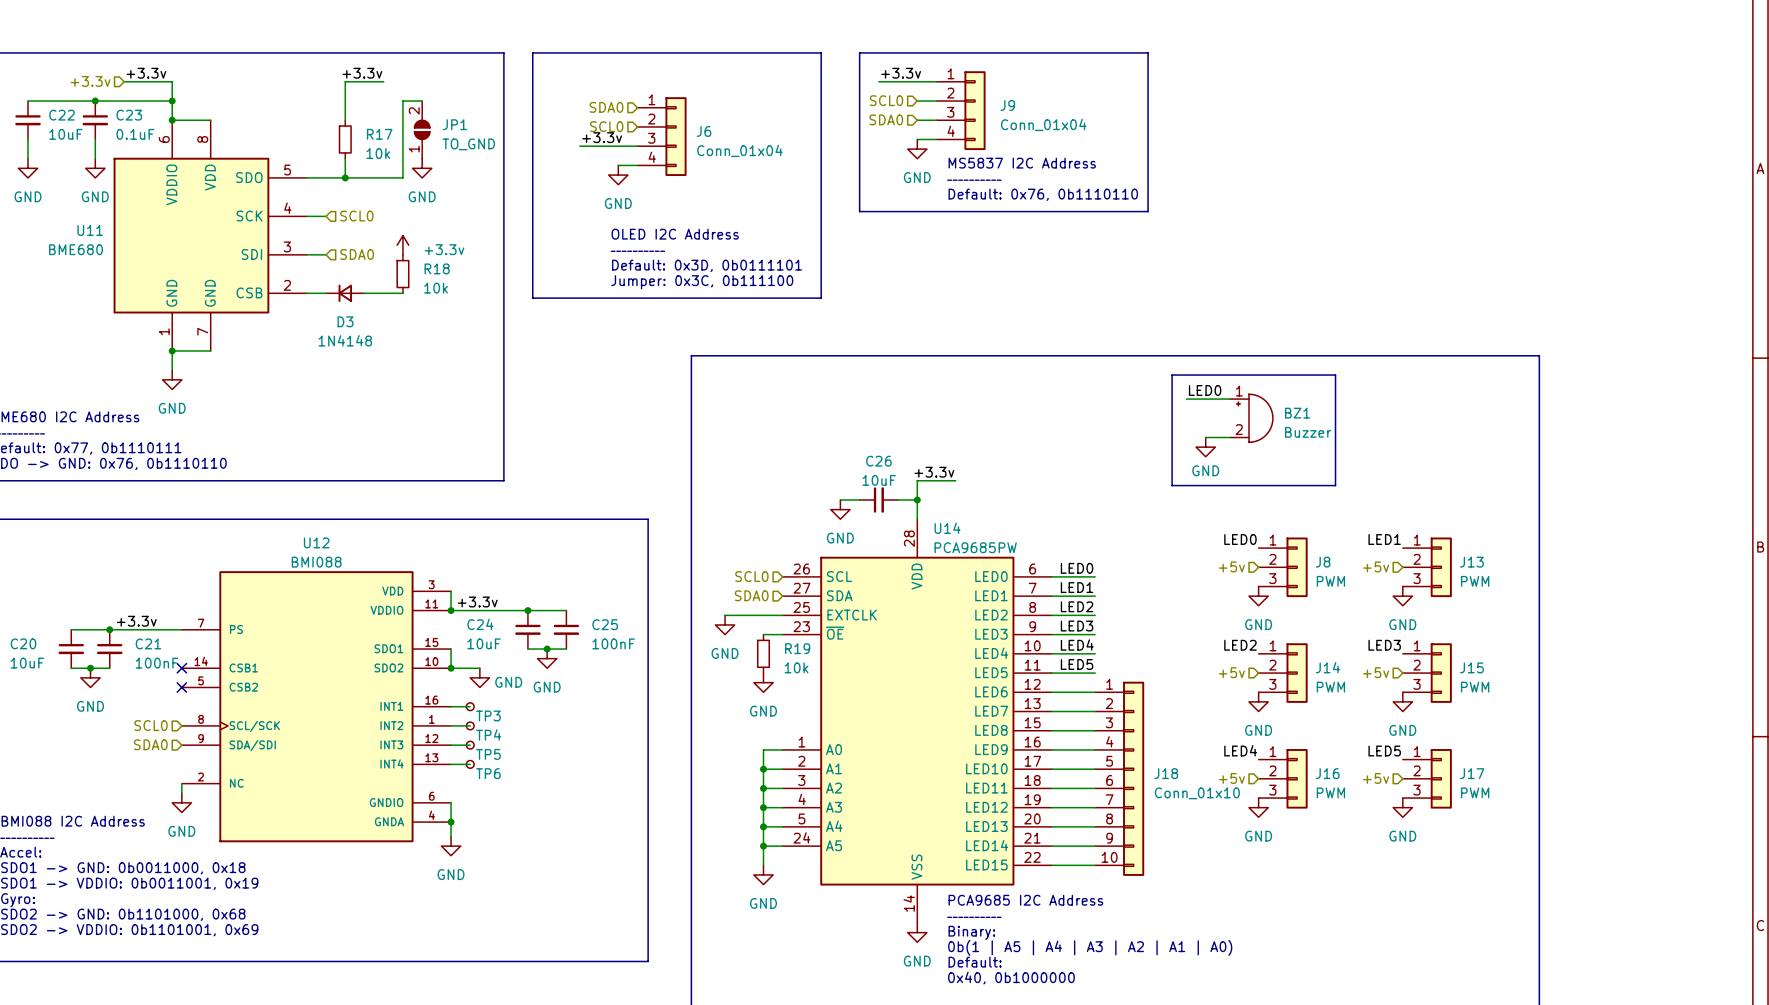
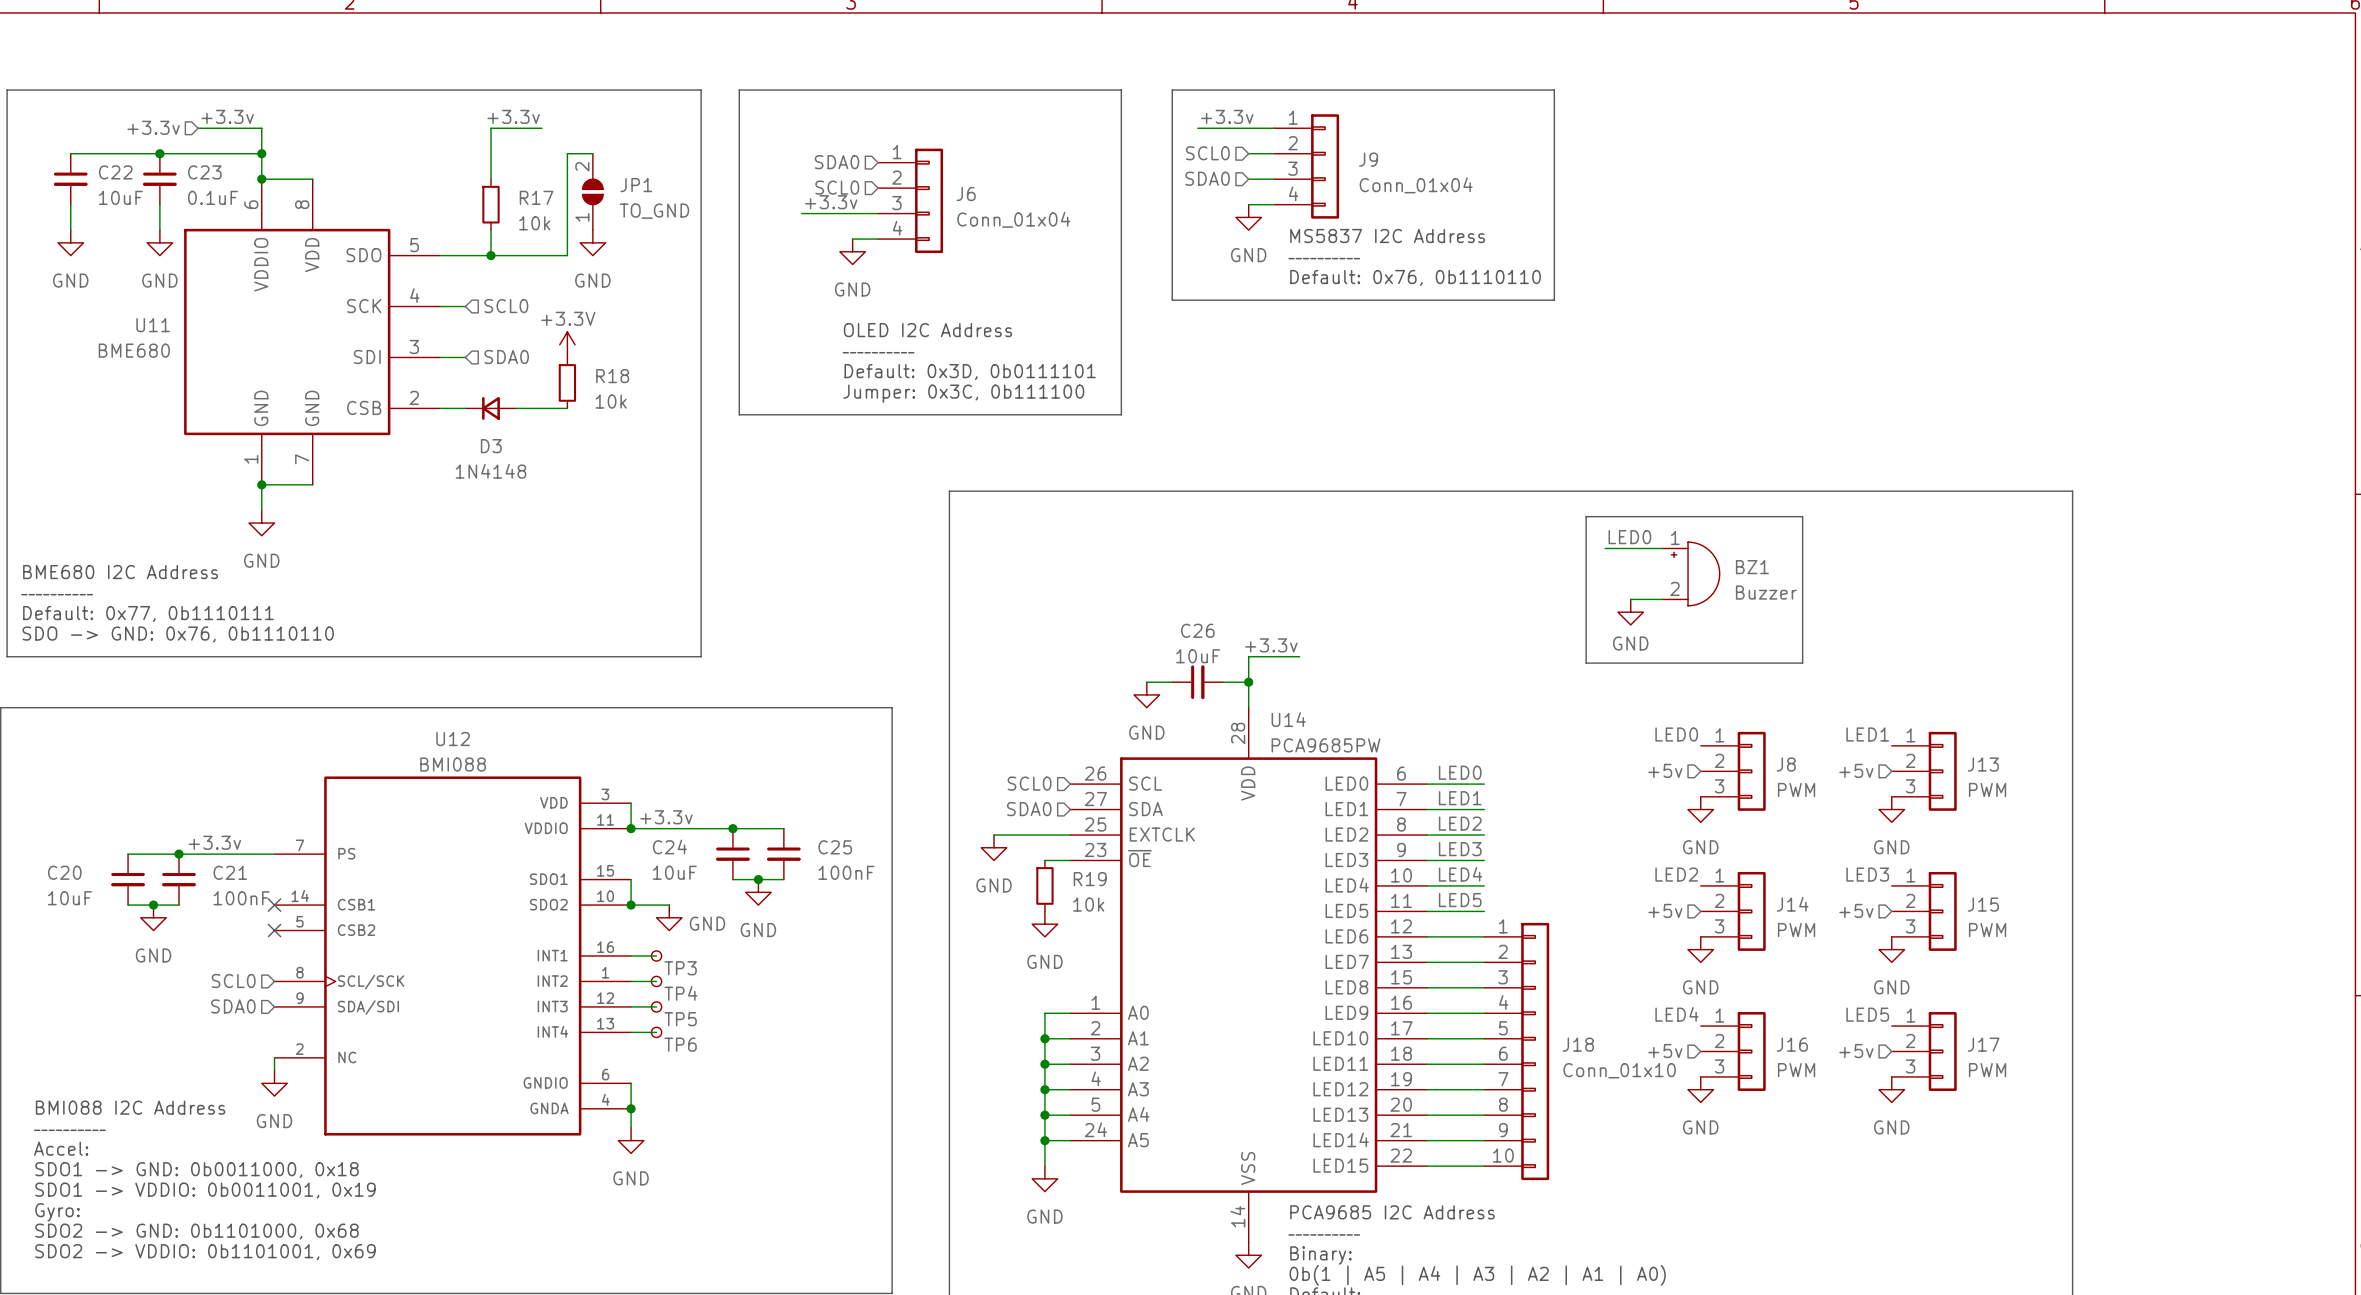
power symbol: +3.3v (402, 245) -> +3.3V (567, 344)

